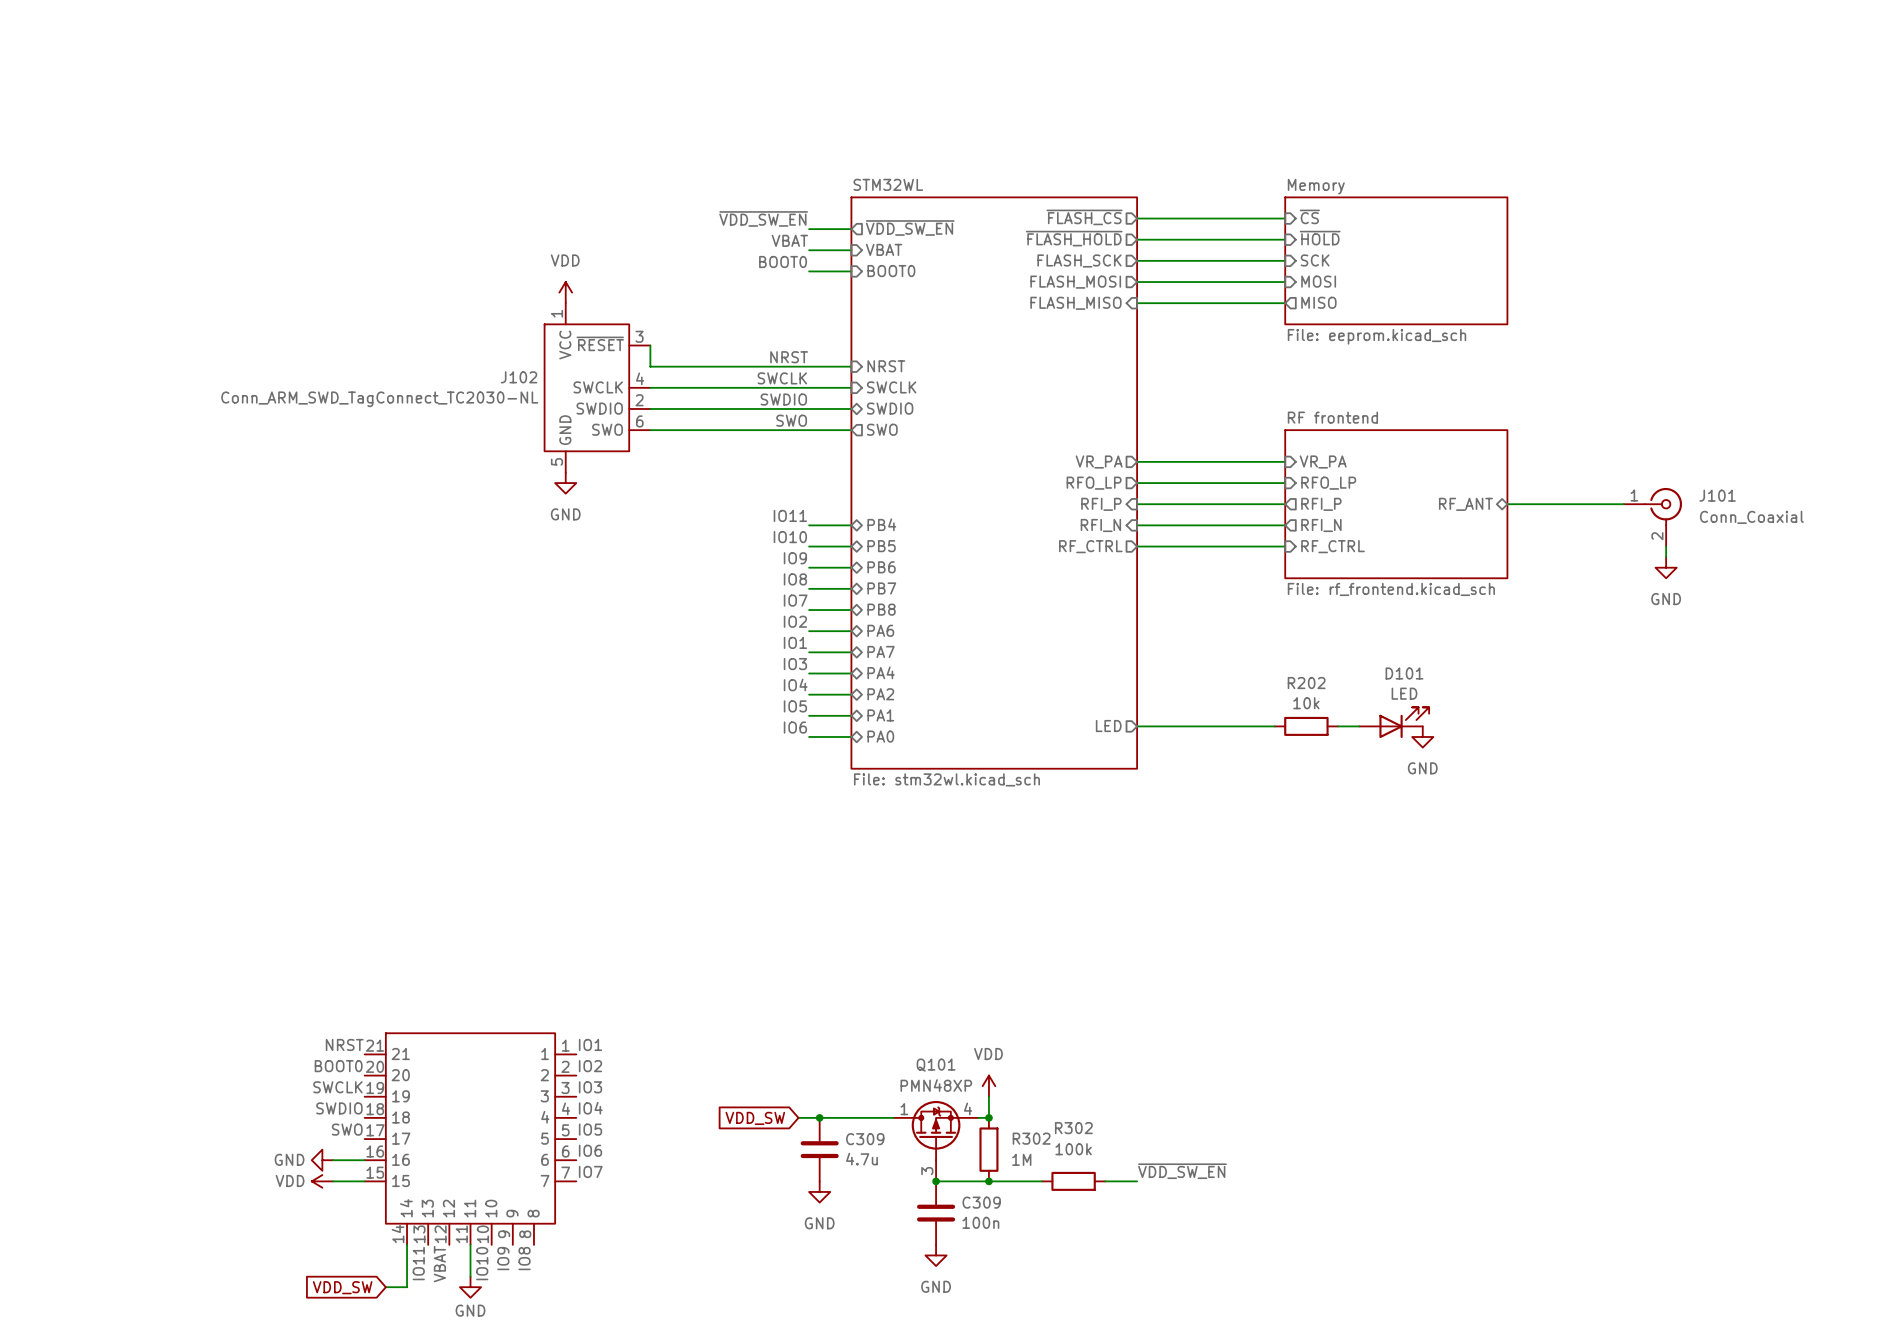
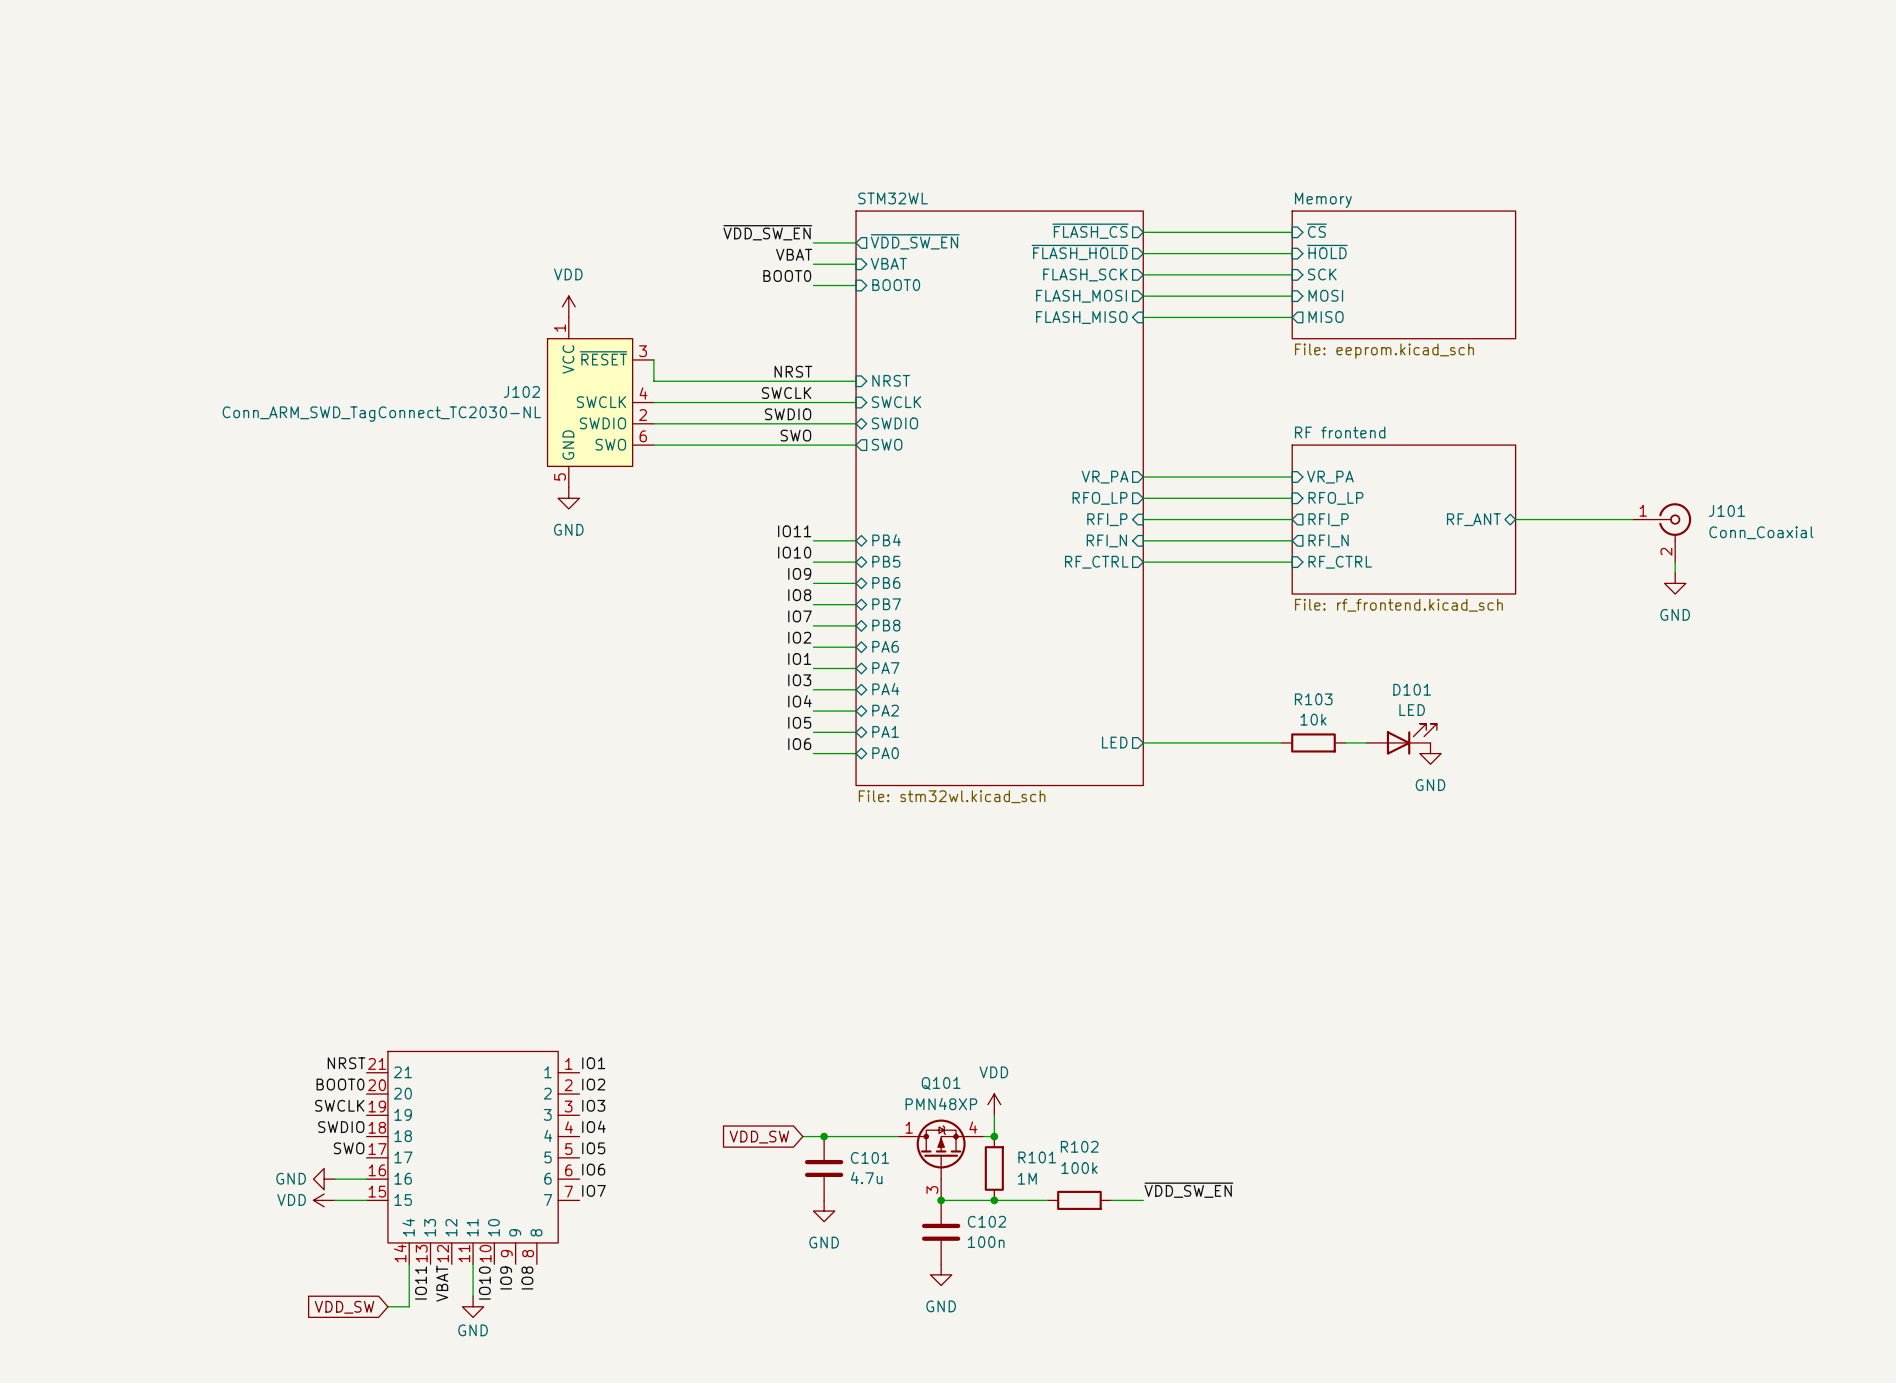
R202 name: R202 (1306, 683) -> R103 (1313, 699)
R302 name: R302 (1073, 1128) -> R102 (1079, 1146)
R302 name: R302 (1031, 1138) -> R101 (1037, 1157)
C309 name: C309 (865, 1139) -> C101 (869, 1157)
C309 name: C309 (981, 1202) -> C102 (986, 1221)

